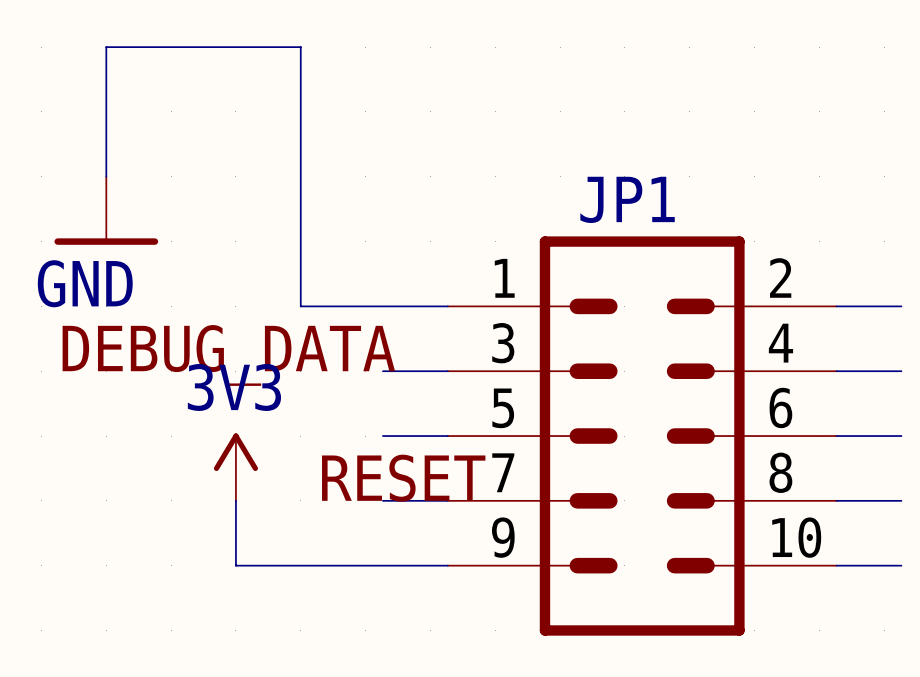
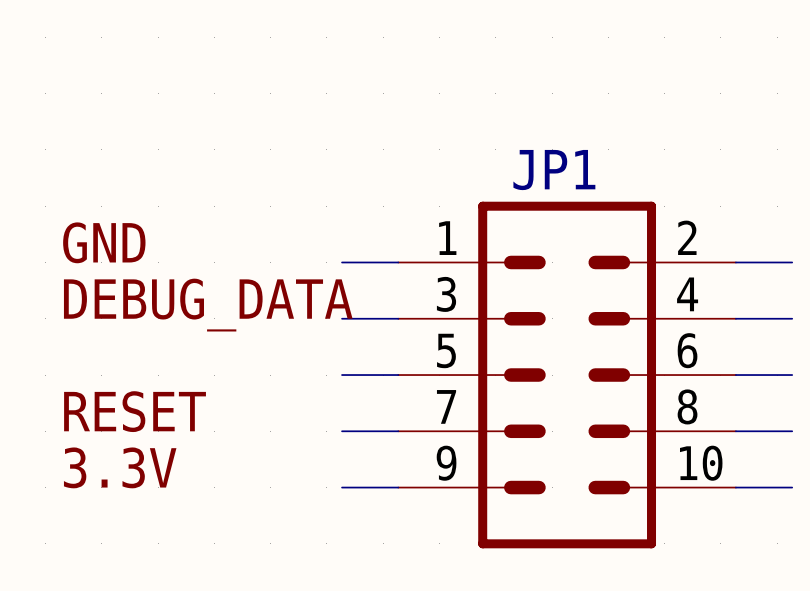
wire: (106, 176) (106, 47) (300, 47) (300, 306) (382, 306) -> none
power symbol: GND (106, 210) -> none
label: none -> GND (104, 242)
power symbol: 3V3 (235, 467) -> none
label position: RESET (403, 478) -> RESET (135, 411)
wire: (235, 500) (235, 565) (382, 565) -> none
label: none -> 3.3V (120, 467)

